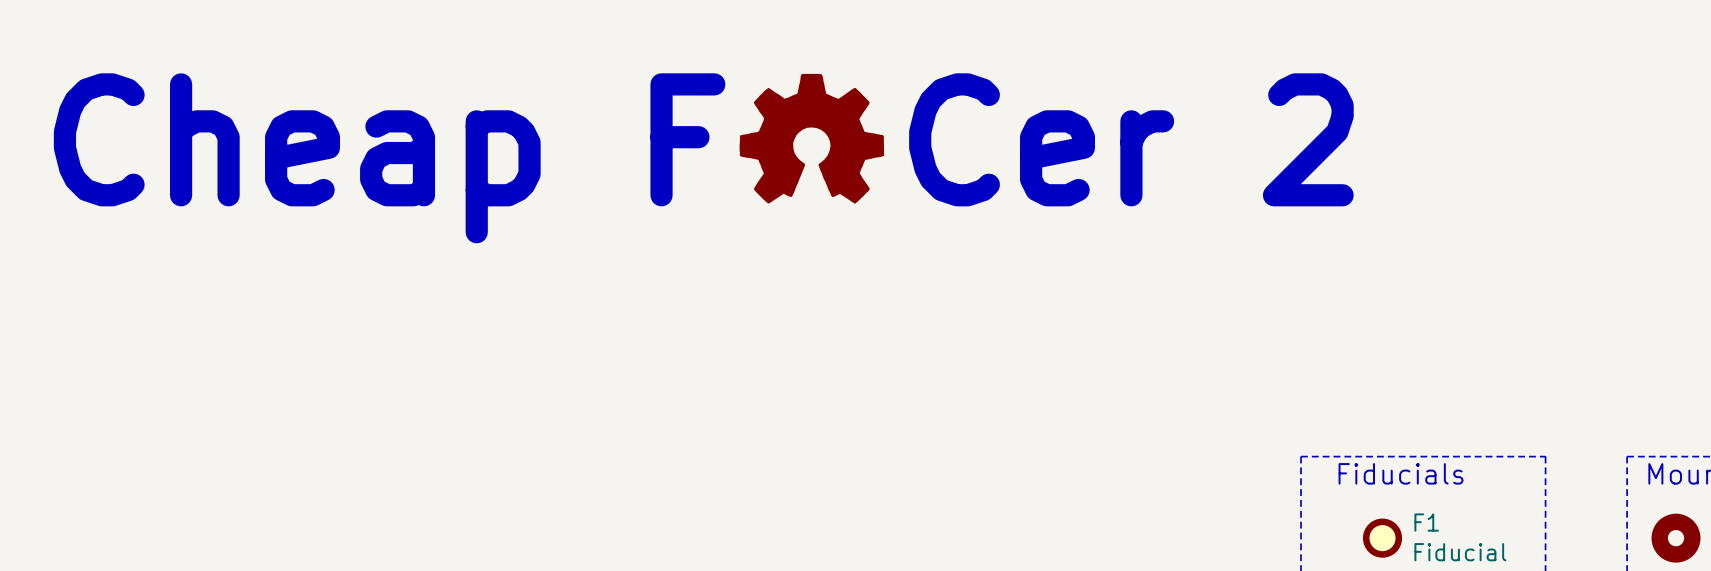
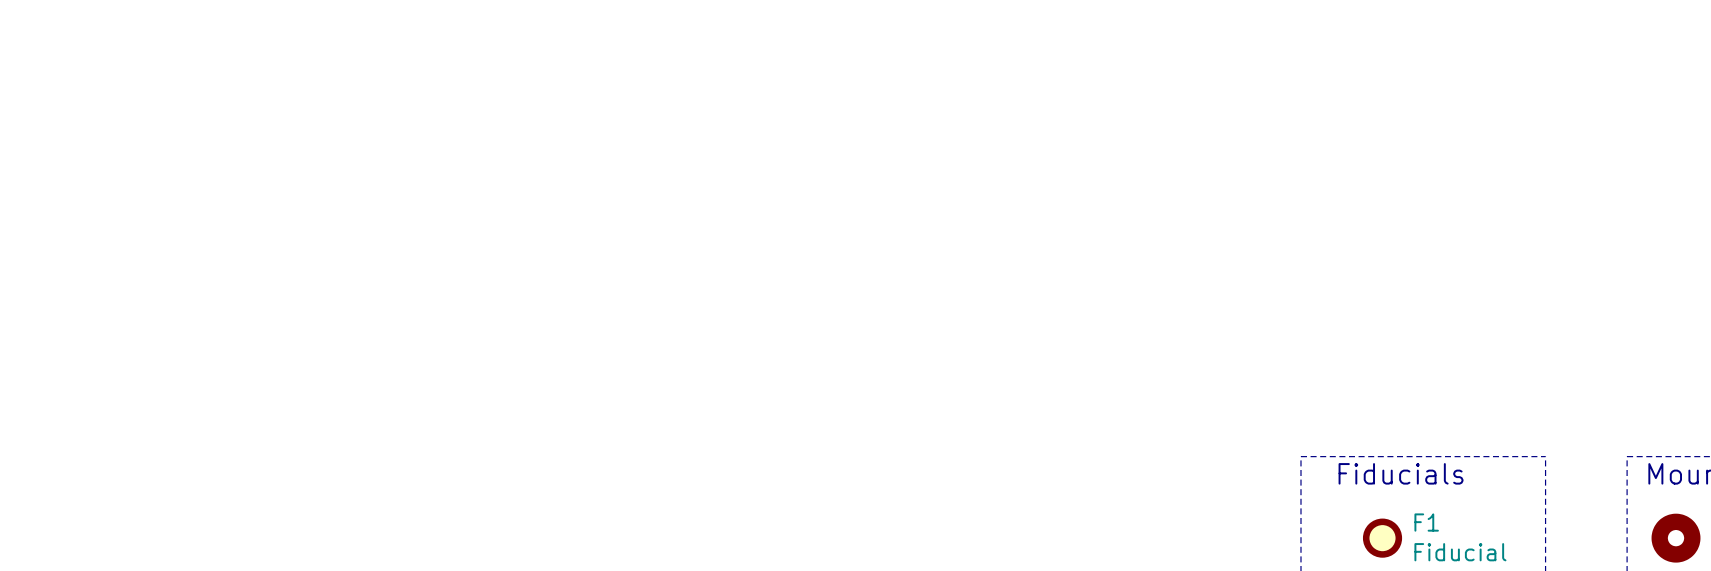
power symbol: (811, 138) -> none
text: Cheap F Cer 2 (703, 158) -> none

